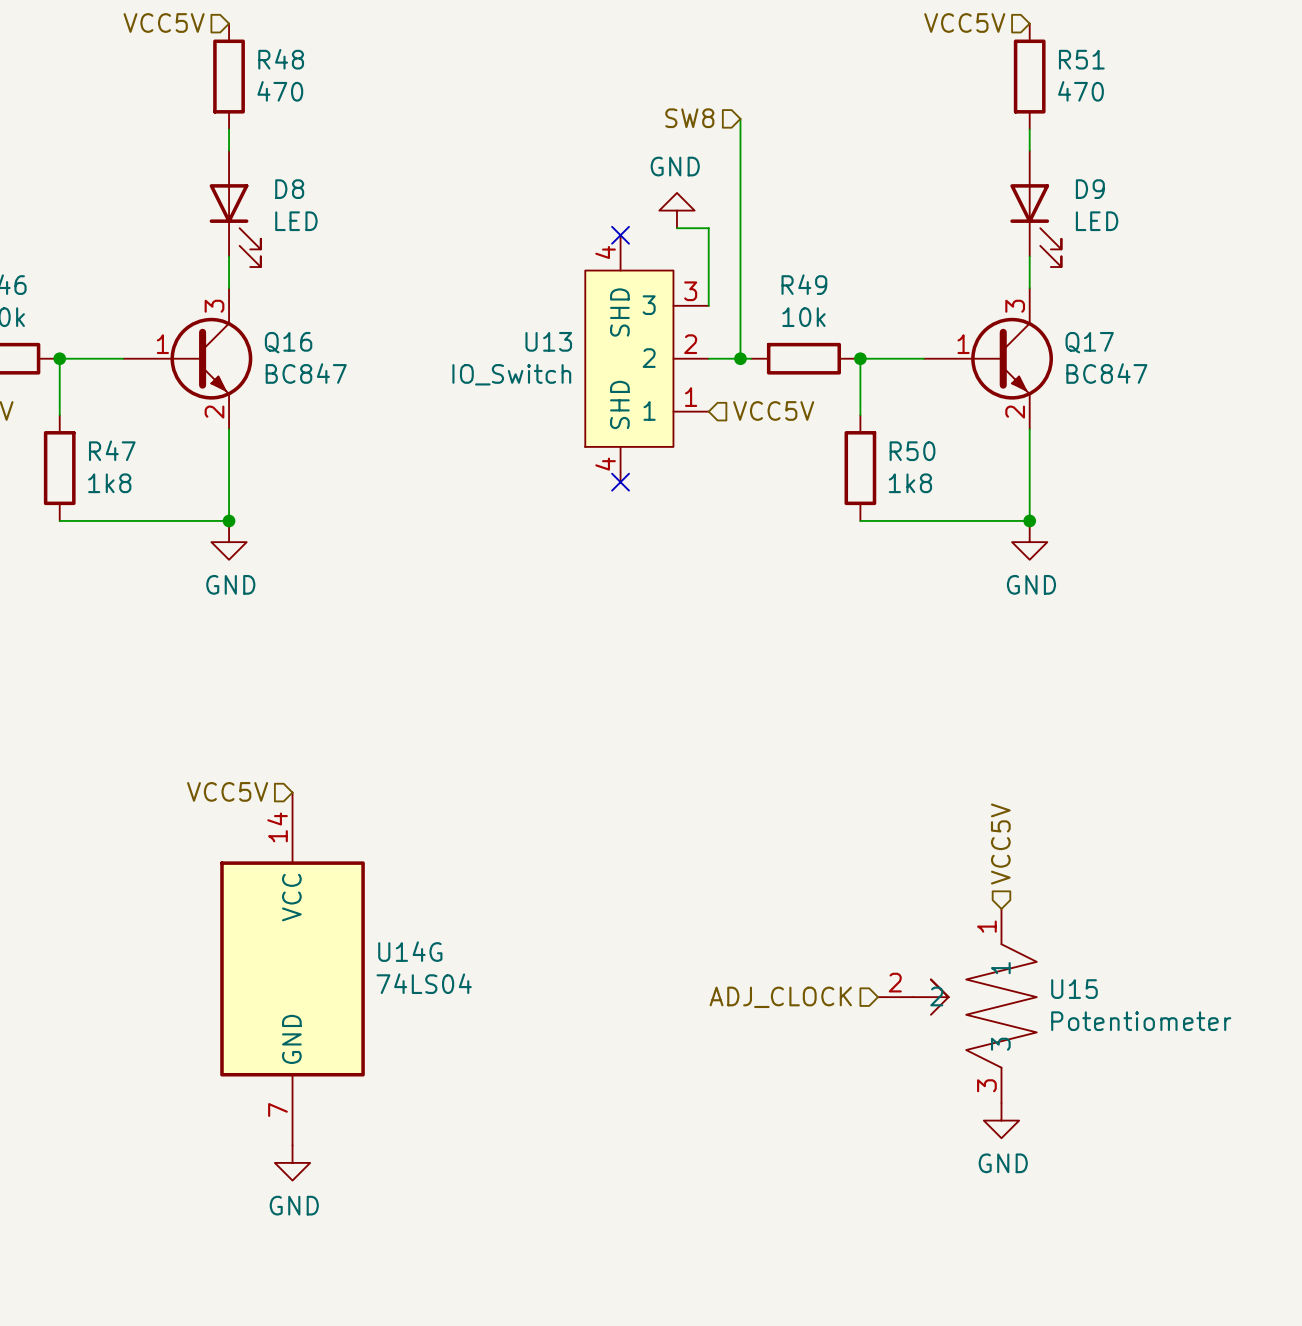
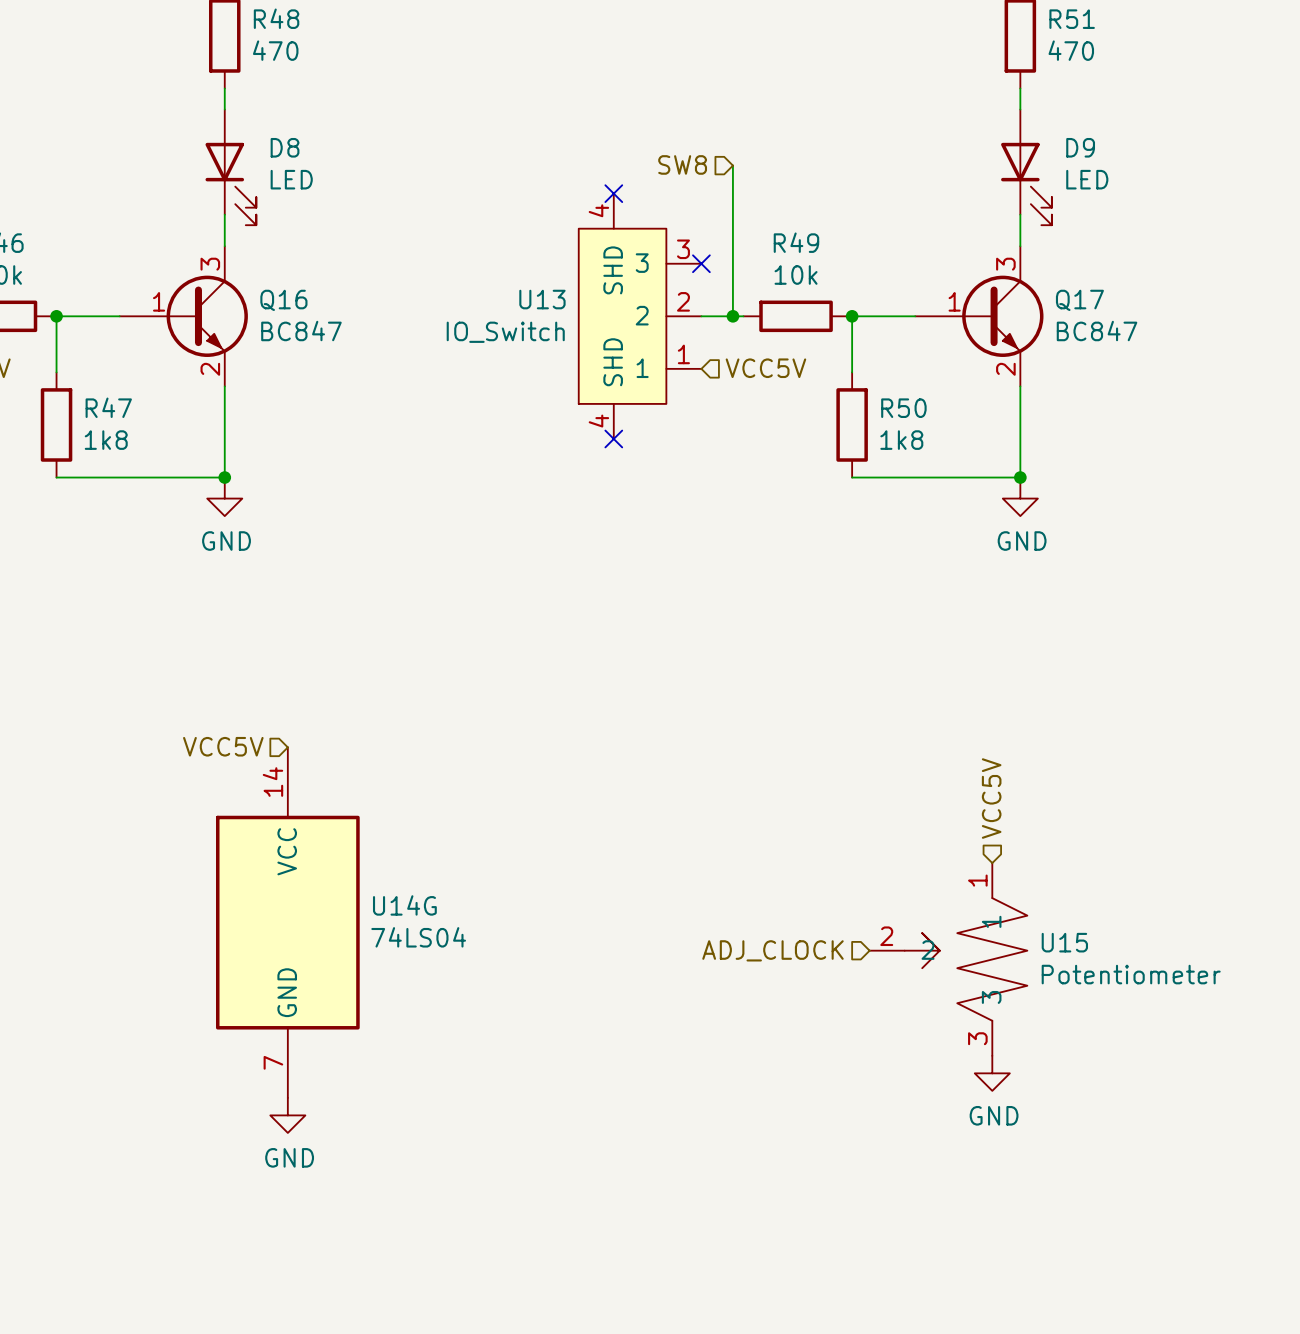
hierarchical label position: SW8 (689, 118) -> SW8 (682, 164)
wire: (740, 118) (740, 207) -> none
power symbol: GND (676, 210) -> none
wire: (676, 228) (708, 228) (708, 305) -> none
no-connect mark: none -> (701, 263)

